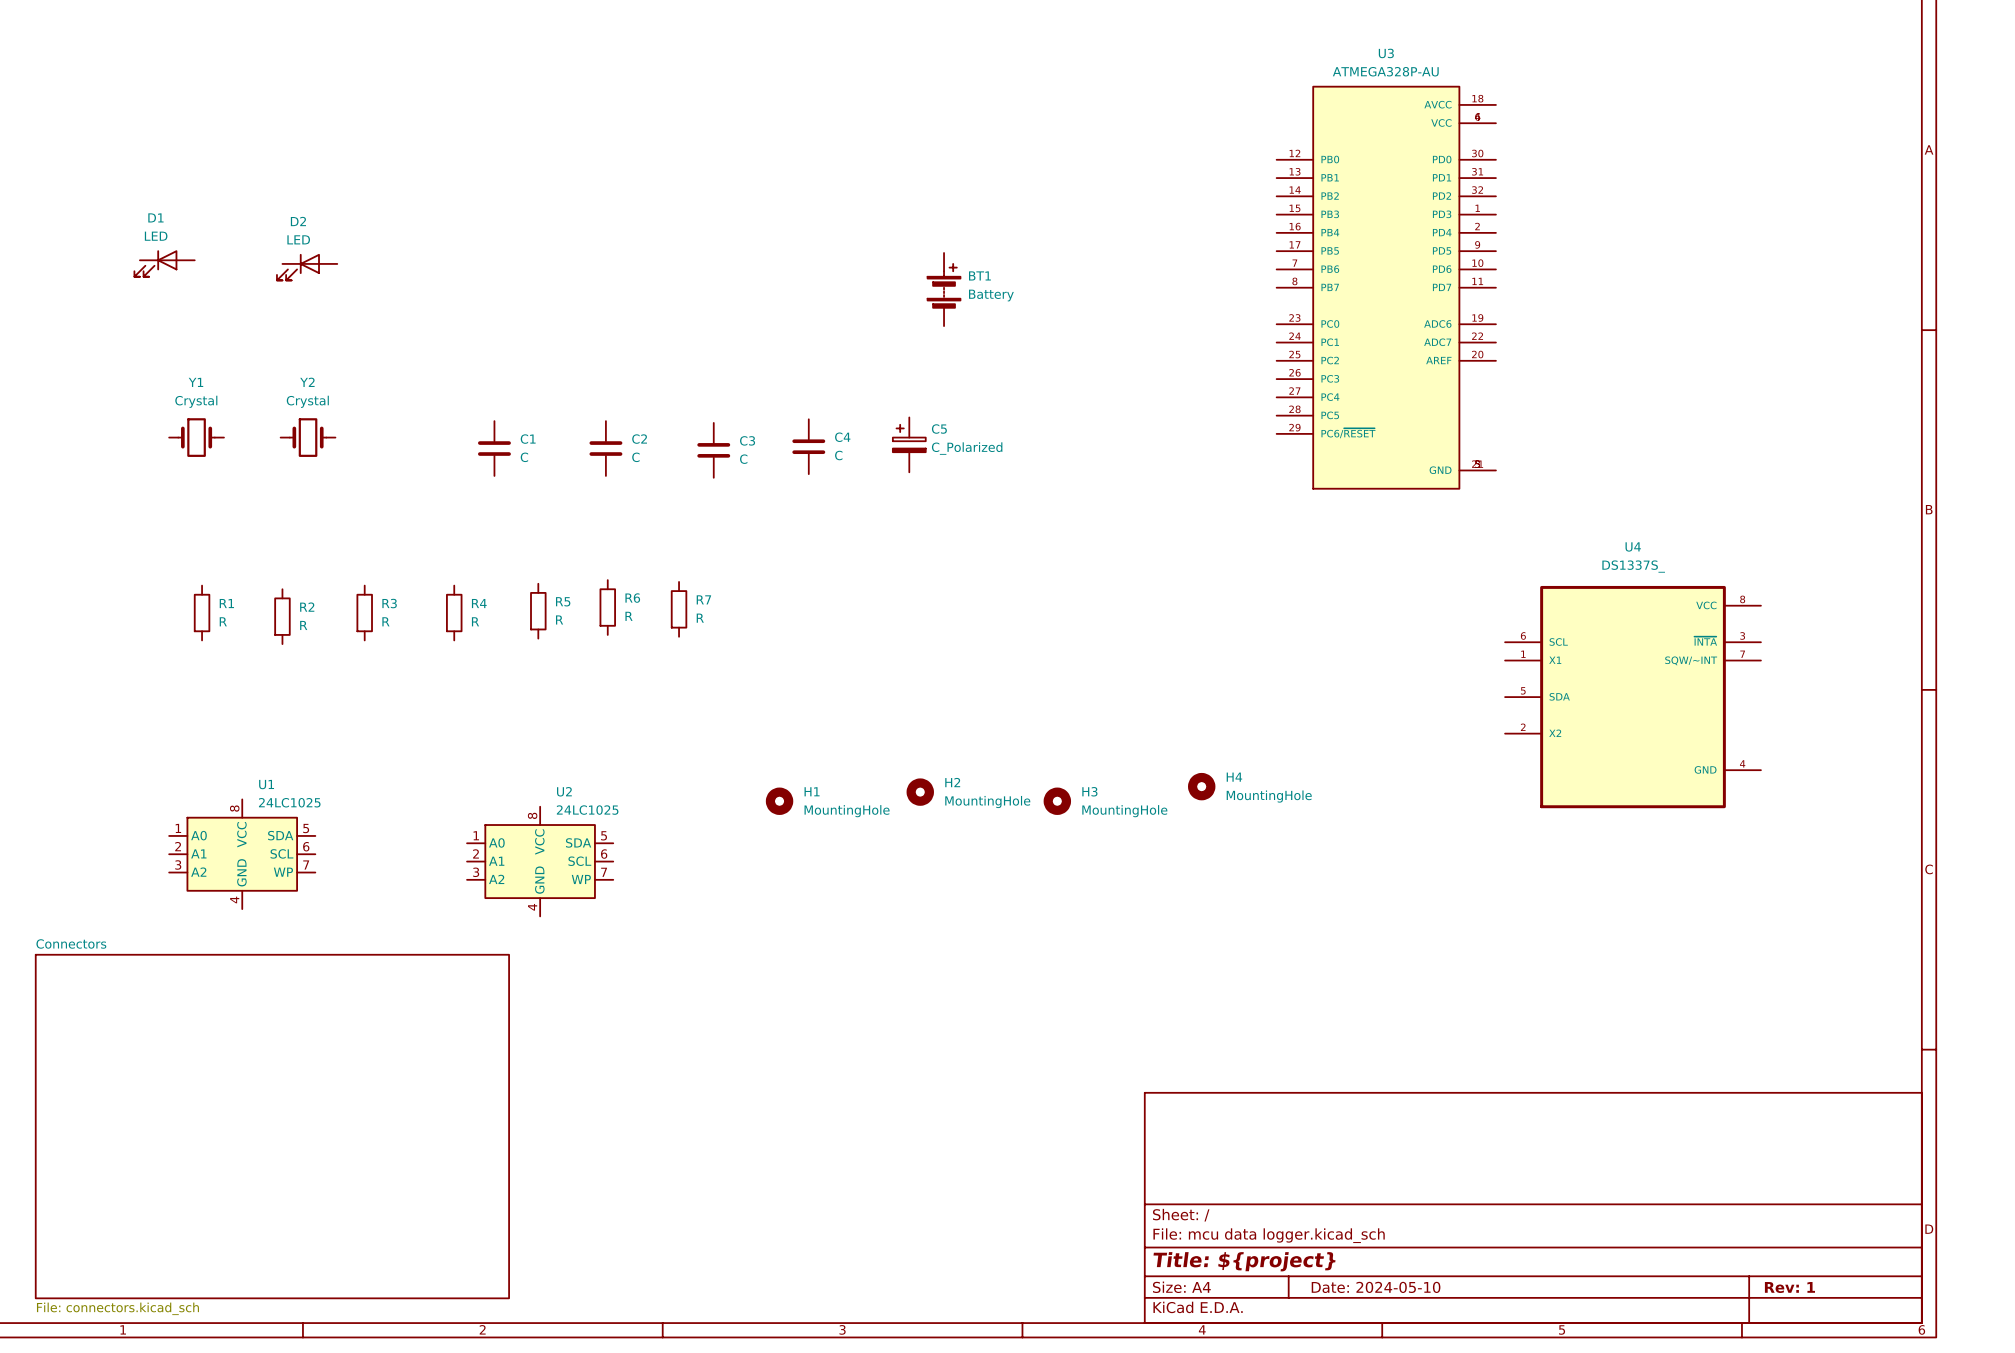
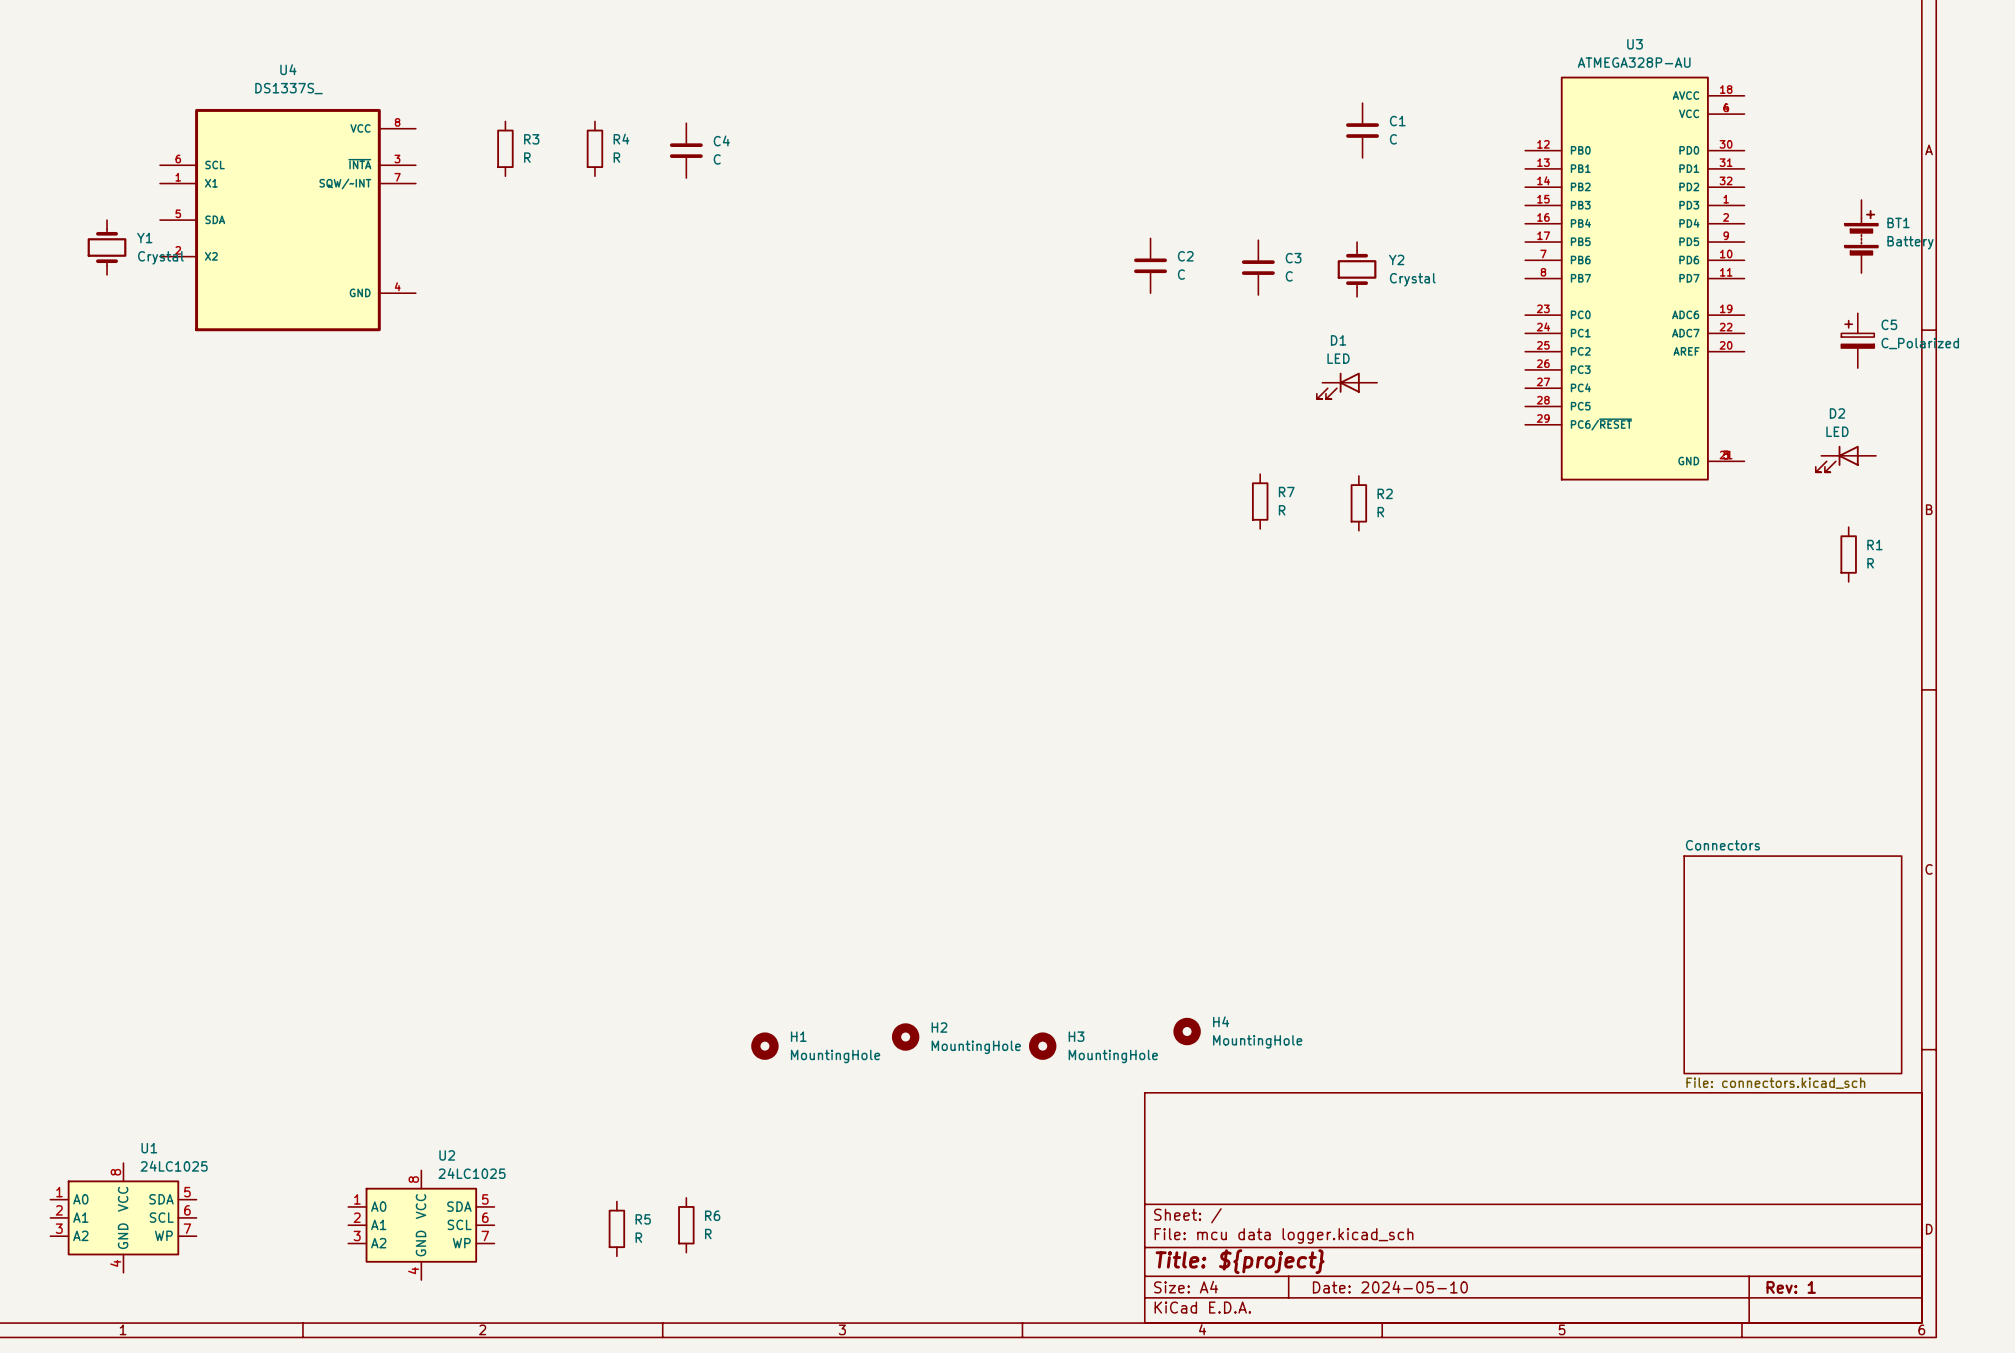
D1 position: (164, 263) -> (1347, 385)
D2 position: (307, 267) -> (1845, 459)
U3 position: (1386, 287) -> (1634, 278)
BT1 position: (944, 289) -> (1861, 236)
Y1 name position: Y1 (195, 382) -> Y1 (144, 238)
Y2 name position: Y2 (307, 382) -> Y2 (1396, 259)
Y1 value position: Crystal (196, 401) -> Crystal (160, 257)
Y2 value position: Crystal (307, 401) -> Crystal (1412, 279)
Y1 rotation: 0° (196, 437) -> 90° clockwise (107, 247)
Y1 position: (196, 437) -> (107, 247)
Y2 rotation: 0° (308, 437) -> 90° clockwise (1357, 269)
Y2 position: (308, 437) -> (1357, 269)
C5 position: (909, 444) -> (1857, 340)
C4 position: (808, 446) -> (686, 150)
C1 position: (494, 448) -> (1362, 130)
C2 position: (605, 448) -> (1150, 265)
C3 position: (713, 450) -> (1258, 267)
R6 position: (607, 607) -> (686, 1225)
R7 position: (679, 609) -> (1260, 501)
R5 position: (538, 611) -> (616, 1228)
R1 position: (202, 613) -> (1848, 554)
R3 position: (364, 613) -> (505, 148)
R4 position: (454, 613) -> (594, 148)
R2 position: (282, 616) -> (1358, 503)
U4 position: (1633, 697) -> (287, 220)
H4 position: (1201, 786) -> (1187, 1031)
H2 position: (920, 792) -> (905, 1037)
H1 position: (779, 801) -> (764, 1046)
H3 position: (1057, 801) -> (1042, 1046)
U1 position: (242, 854) -> (123, 1217)
U2 position: (540, 861) -> (421, 1225)
sheet Connectors: none -> File: connectors.kicad_sch (1792, 964)
sheet Connectors: File: connectors.kicad_sch (272, 1126) -> none

